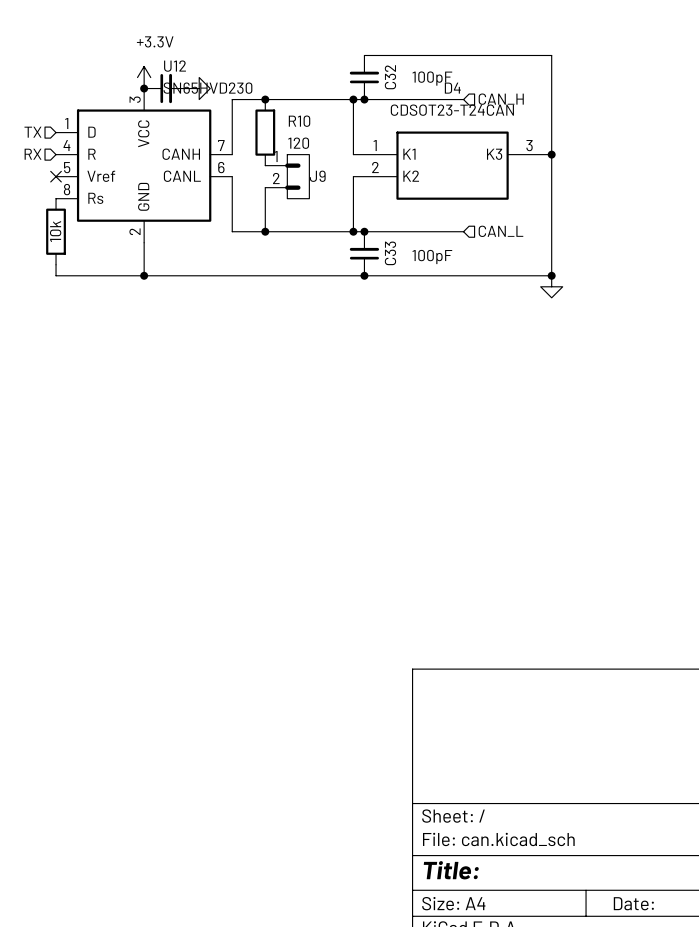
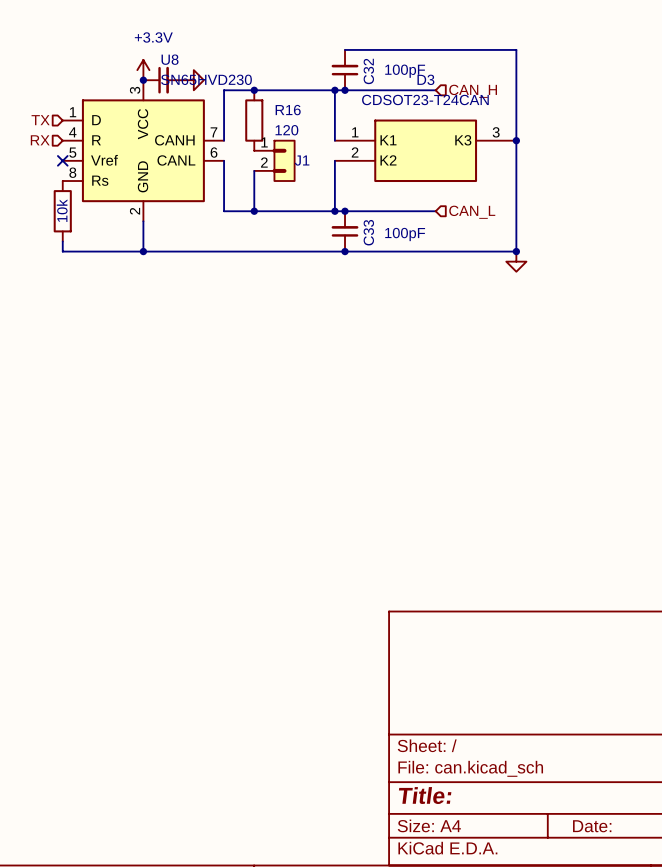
U12 name: U12 (175, 66) -> U8 (170, 59)
D4 name: D4 (452, 88) -> D3 (425, 79)
R10 name: R10 (299, 121) -> R16 (288, 110)
J9 name: J9 (317, 176) -> J1 (302, 160)

